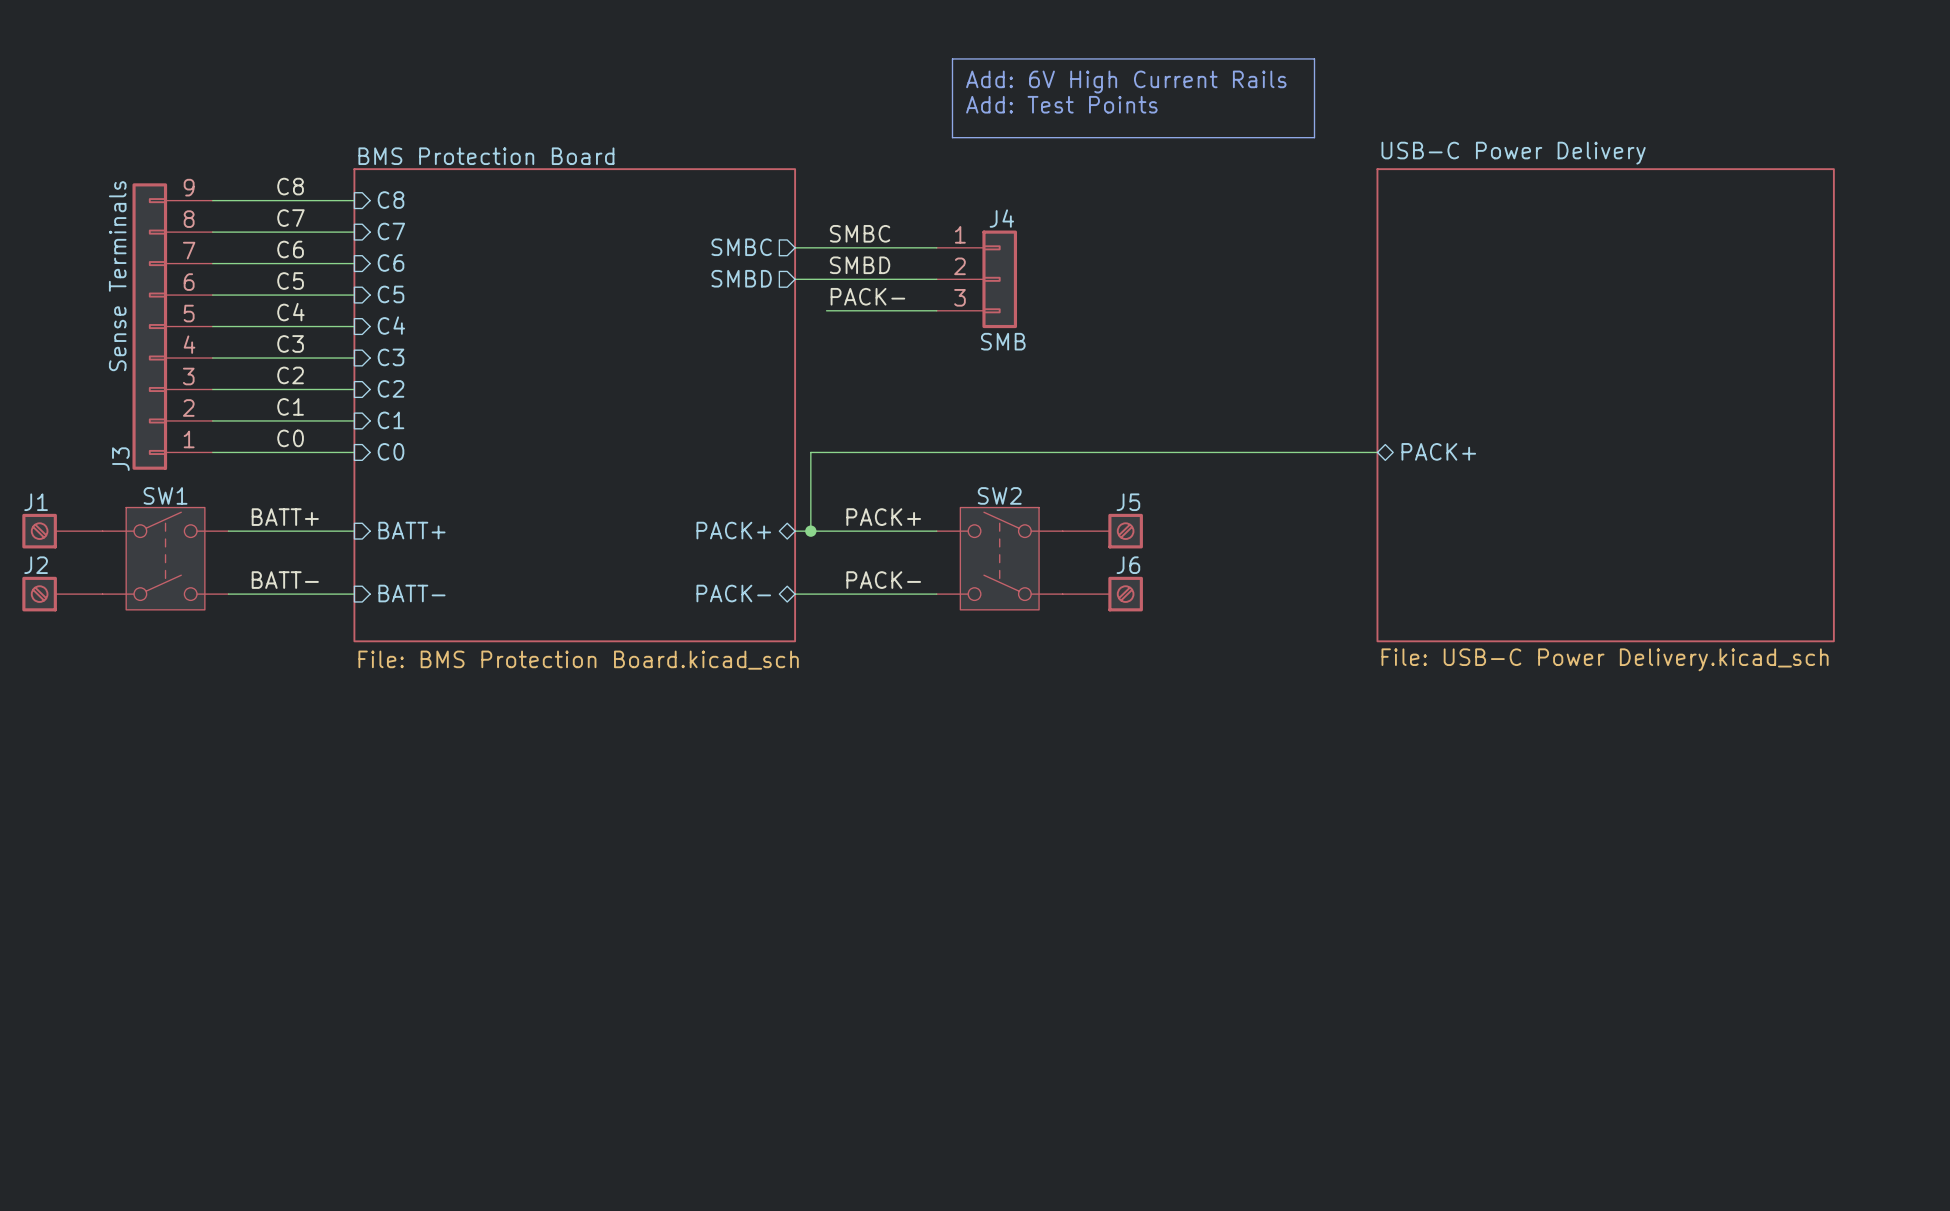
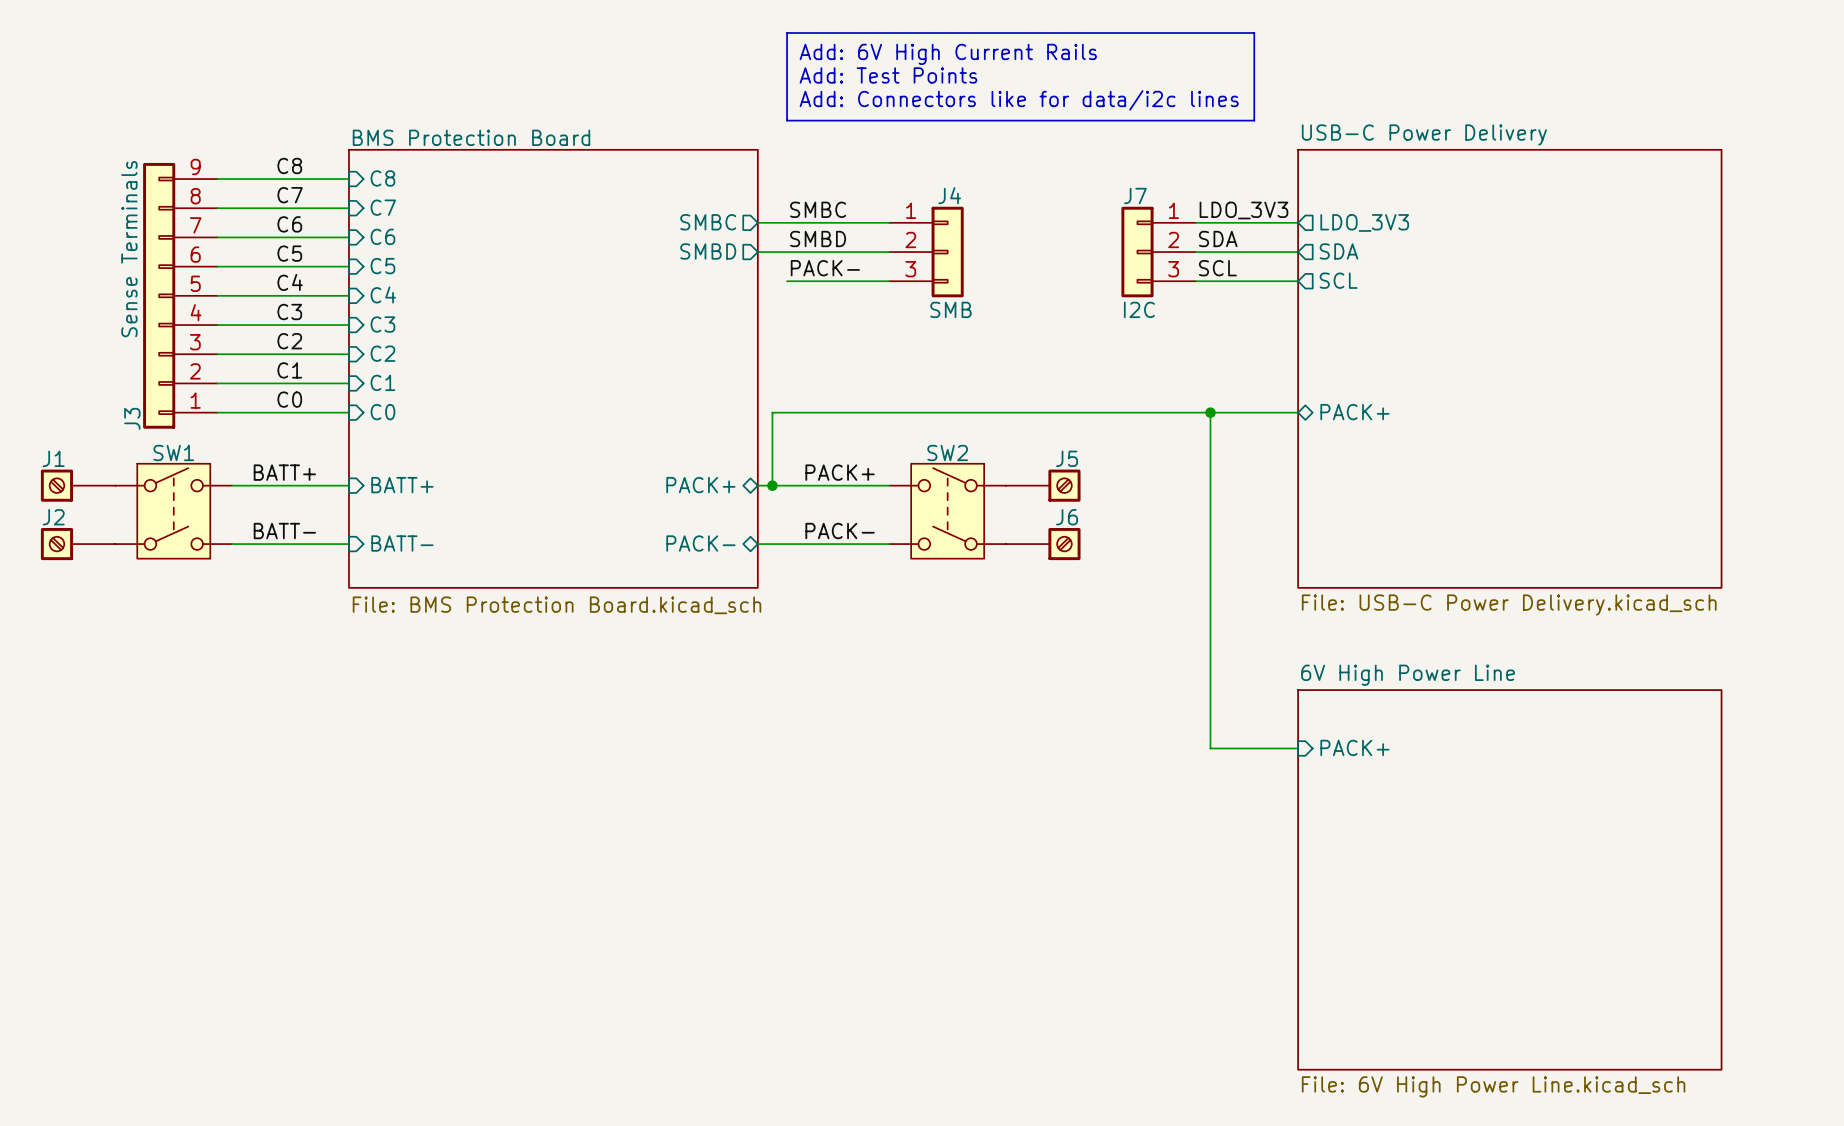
text position: Add: 6V High Current Rails (1126, 82) -> Add: 6V High Current Rails (948, 54)
text position: Add: Test Points (1061, 104) -> Add: Test Points (888, 75)
text: none -> Add: Connectors like for data/i2c lines (1019, 100)
line: (952, 137) (952, 58) (1314, 58) (1314, 137) -> (903, 120) (787, 120) (787, 33) (1254, 33) (1254, 120) (1239, 120)
label: none -> LDO_3V3 (1243, 210)
wire: none -> (1195, 222) (1298, 222)
sheet pin: none -> LDO_3V3 (1364, 222)
label: none -> SDA (1218, 239)
sheet pin: none -> SDA (1338, 251)
J7: none -> I2C (1158, 252)
wire: none -> (1195, 252) (1298, 252)
label: none -> SCL (1217, 268)
wire: none -> (1195, 281) (1298, 281)
sheet pin: none -> SCL (1338, 280)
wire: none -> (1210, 412) (1210, 748) (1298, 748)
junction: none -> (1210, 412)
sheet pin: none -> PACK+ (1354, 747)
sheet 6V High Power Line: none -> File: 6V High Power Line.kicad_sch (1509, 879)

